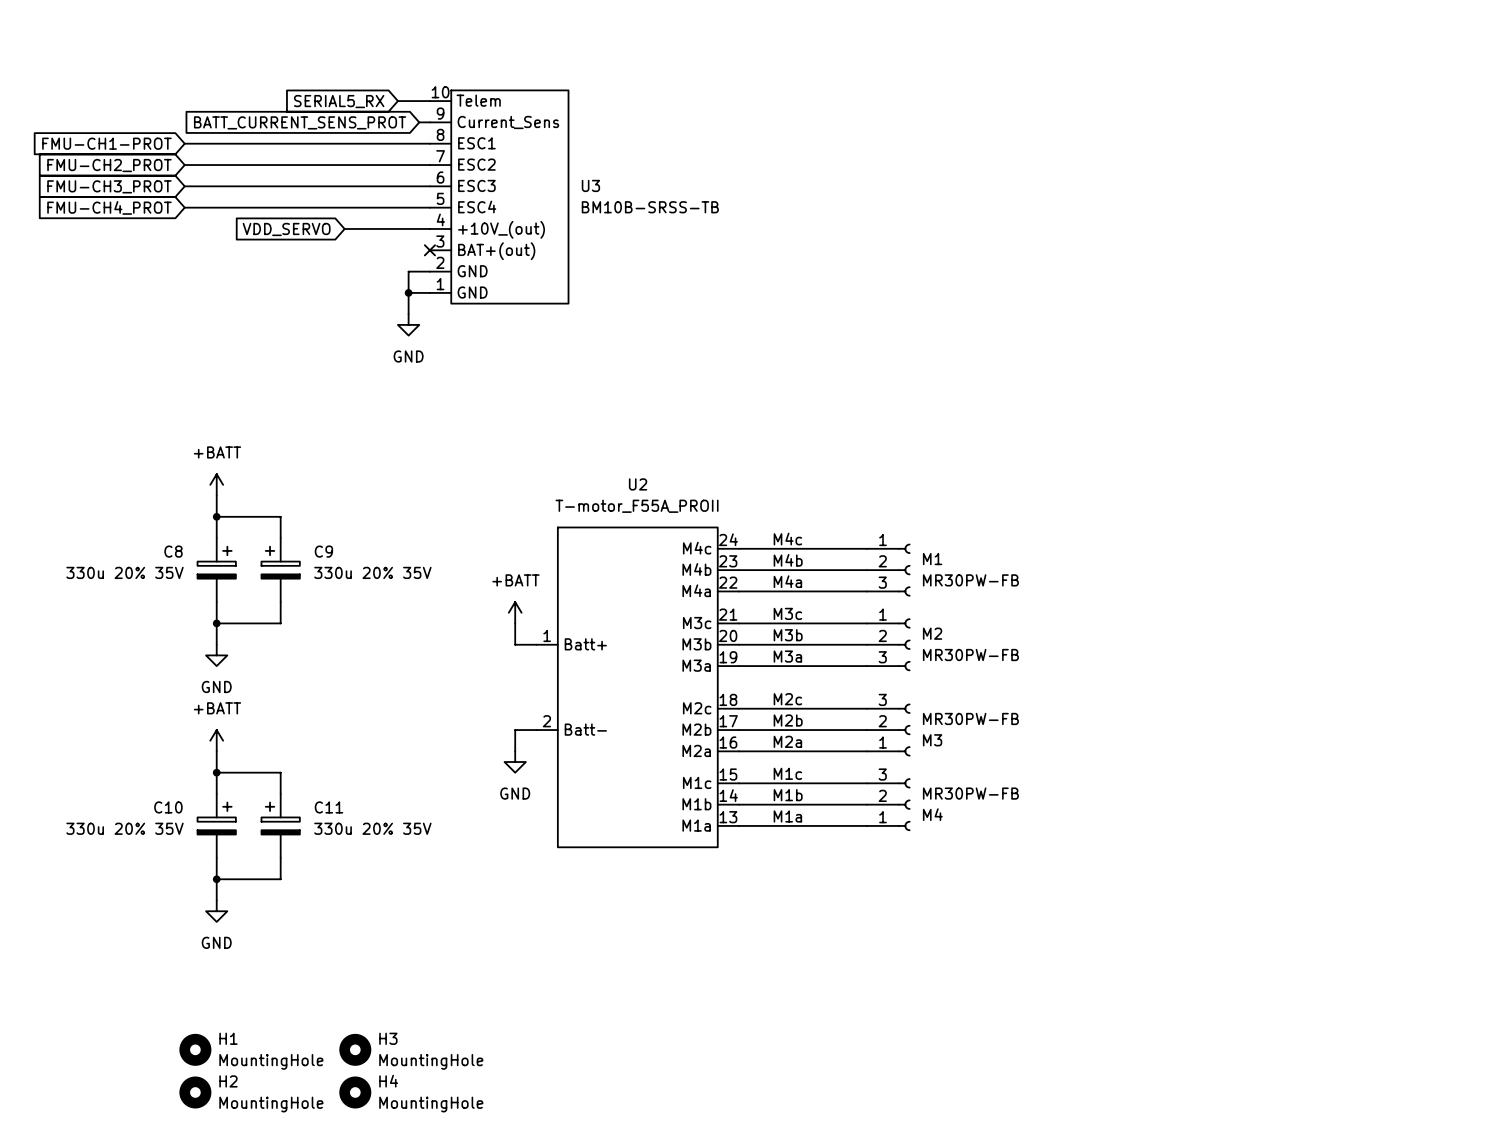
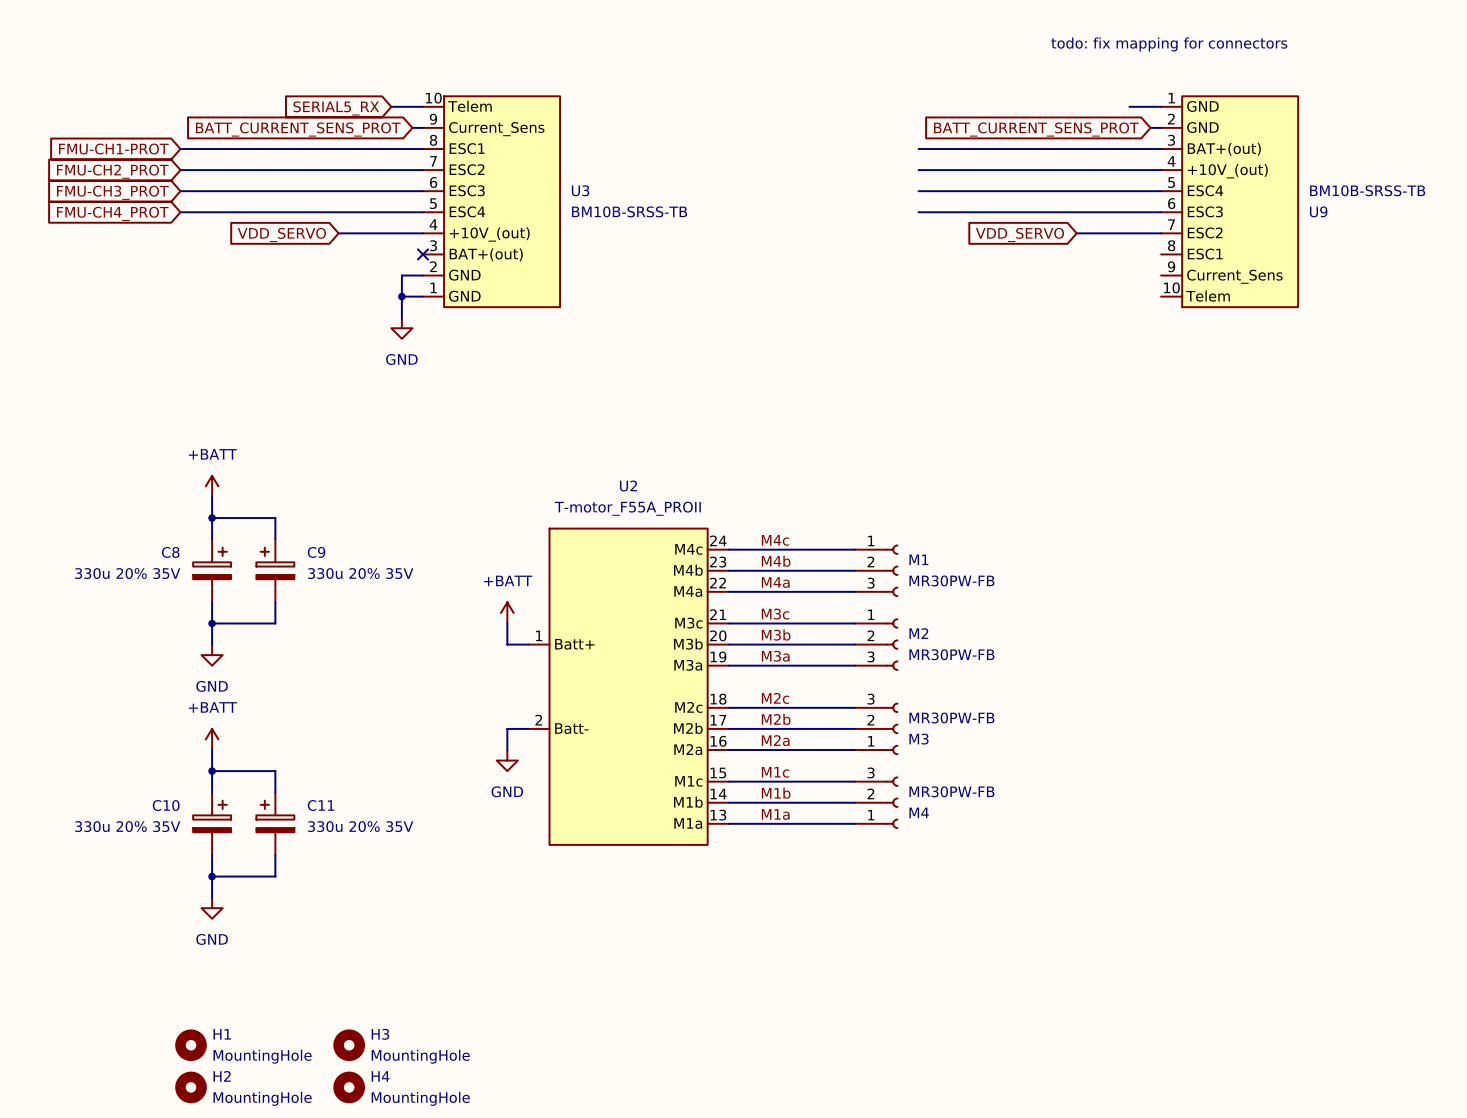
text: none -> todo: fix mapping for connectors (1169, 44)
wire: none -> (1129, 106) (1161, 106)
global label: none -> BATT_CURRENT_SENS_PROT (1036, 129)
wire: none -> (1150, 127) (1161, 127)
wire: none -> (918, 149) (1161, 149)
wire: none -> (918, 170) (1161, 170)
wire: none -> (918, 191) (1161, 191)
U9: none -> BM10B-SRSS-TB (1229, 201)
wire: none -> (918, 212) (1161, 212)
wire: none -> (1076, 233) (1161, 233)
global label: none -> VDD_SERVO (1019, 234)

